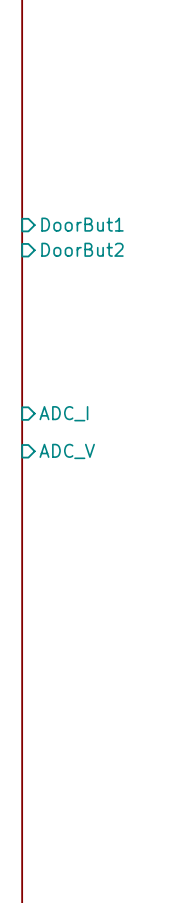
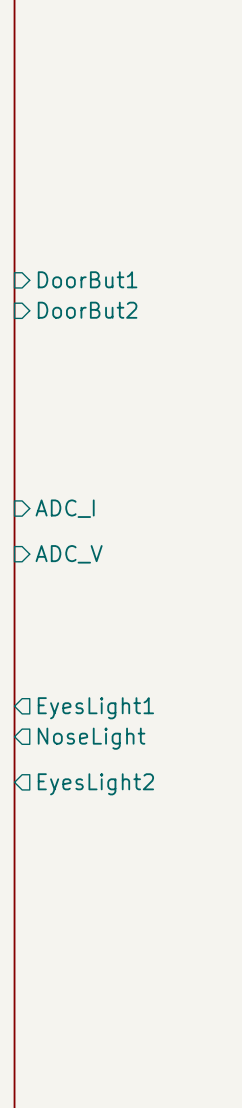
sheet pin: none -> EyesLight1 (95, 708)
sheet pin: none -> NoseLight (91, 738)
sheet pin: none -> EyesLight2 (95, 784)

